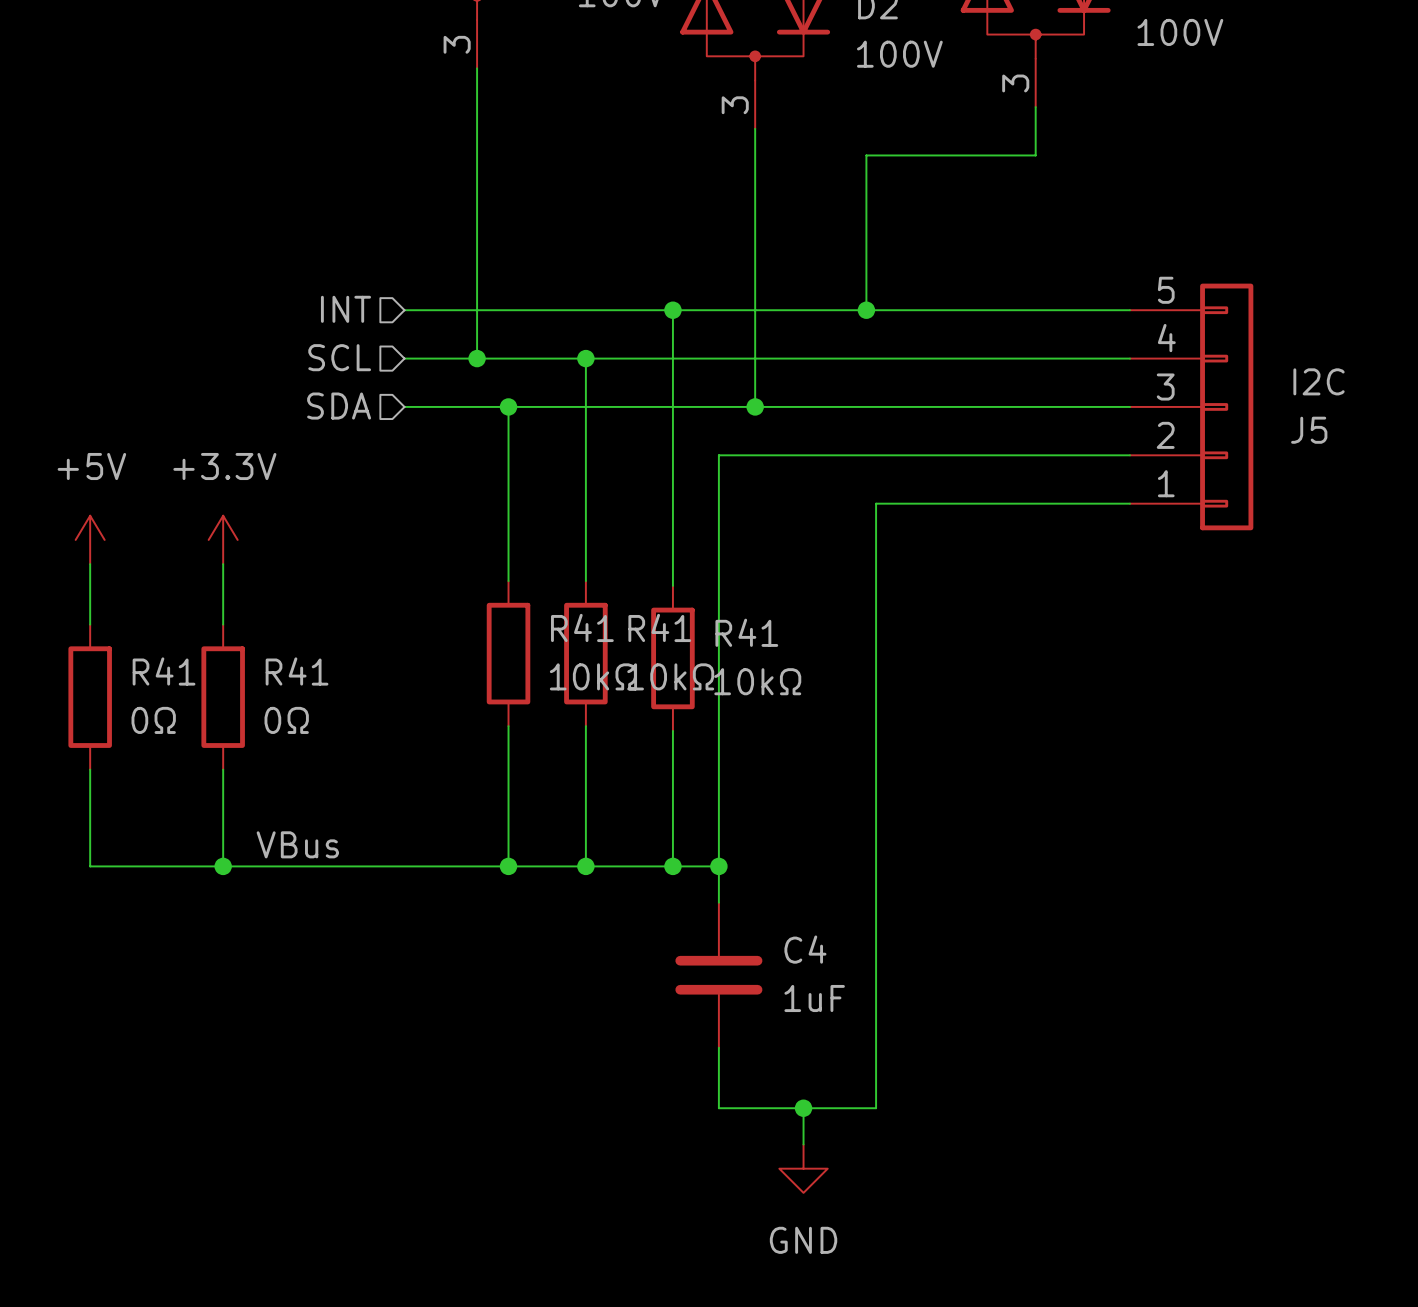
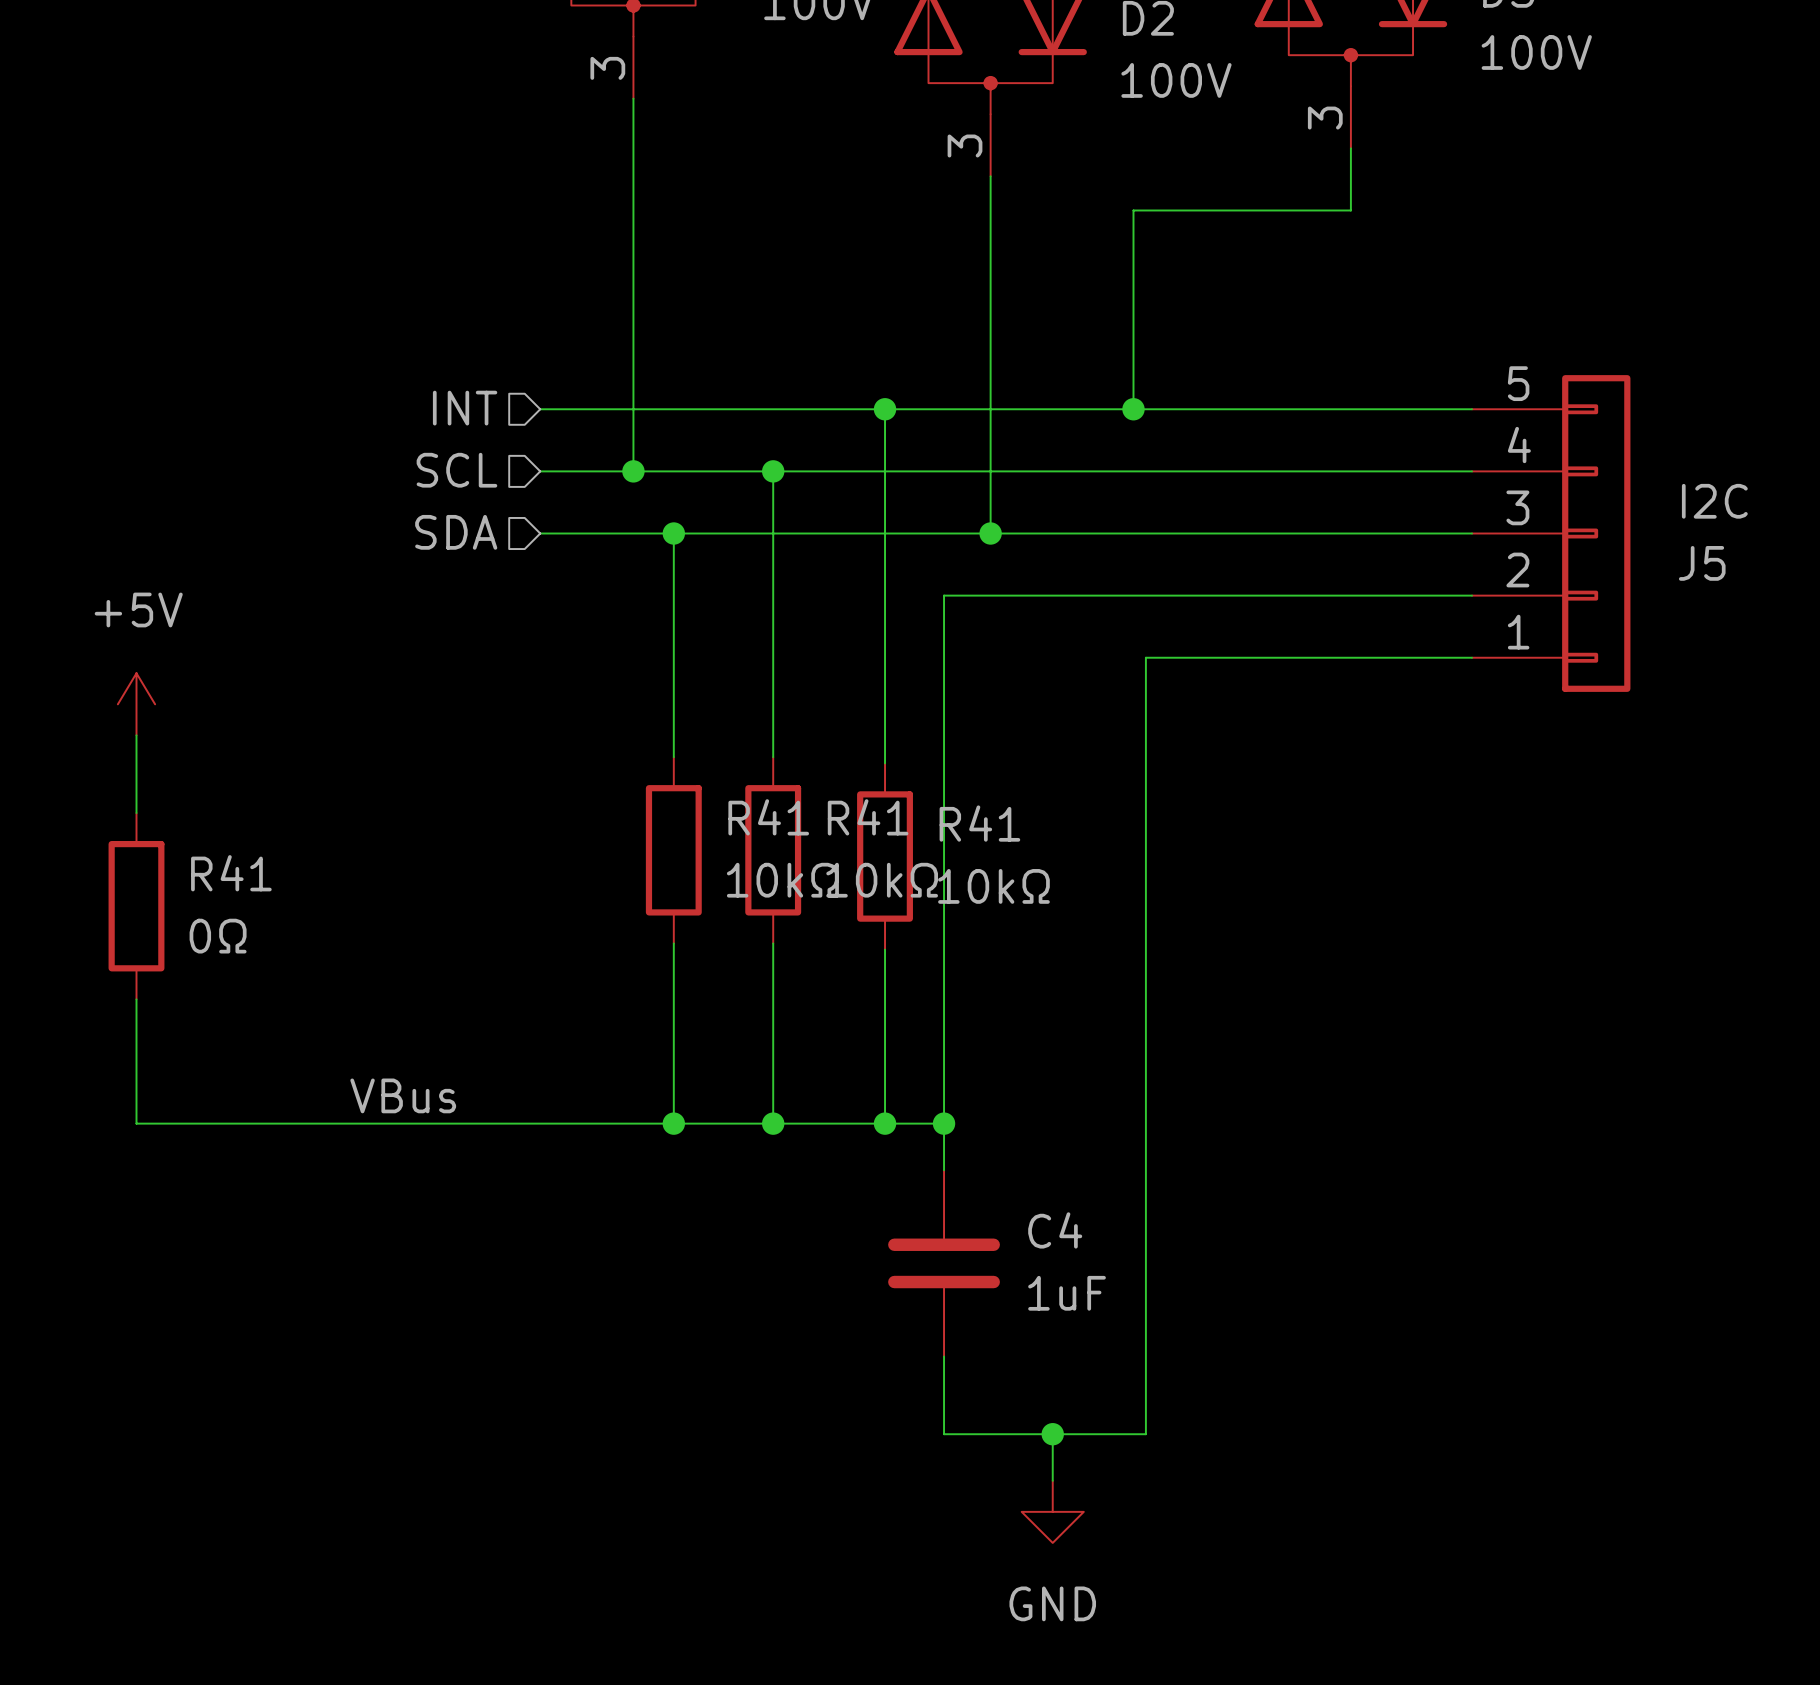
power symbol: +3.3V (223, 539) -> none
wire: (223, 564) (223, 624) -> none
R41: 0Ω (223, 697) -> none
wire: (223, 769) (223, 866) -> none
junction: (223, 866) -> none

